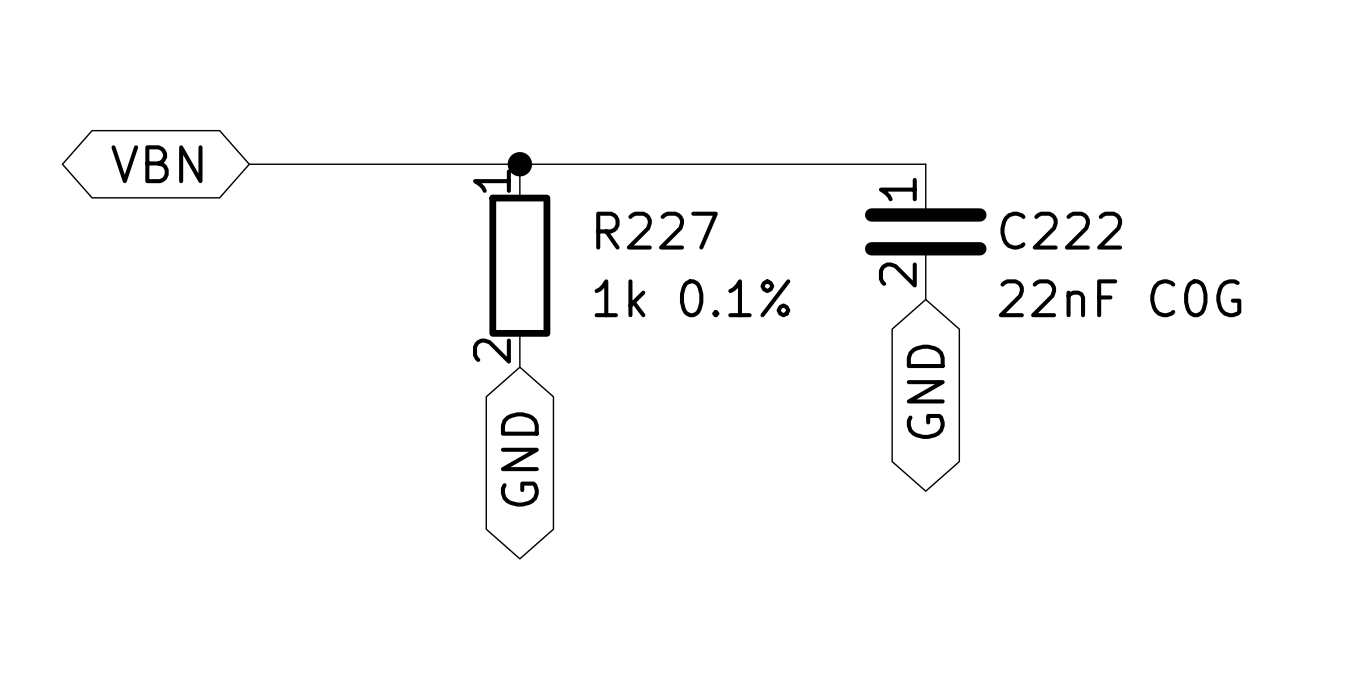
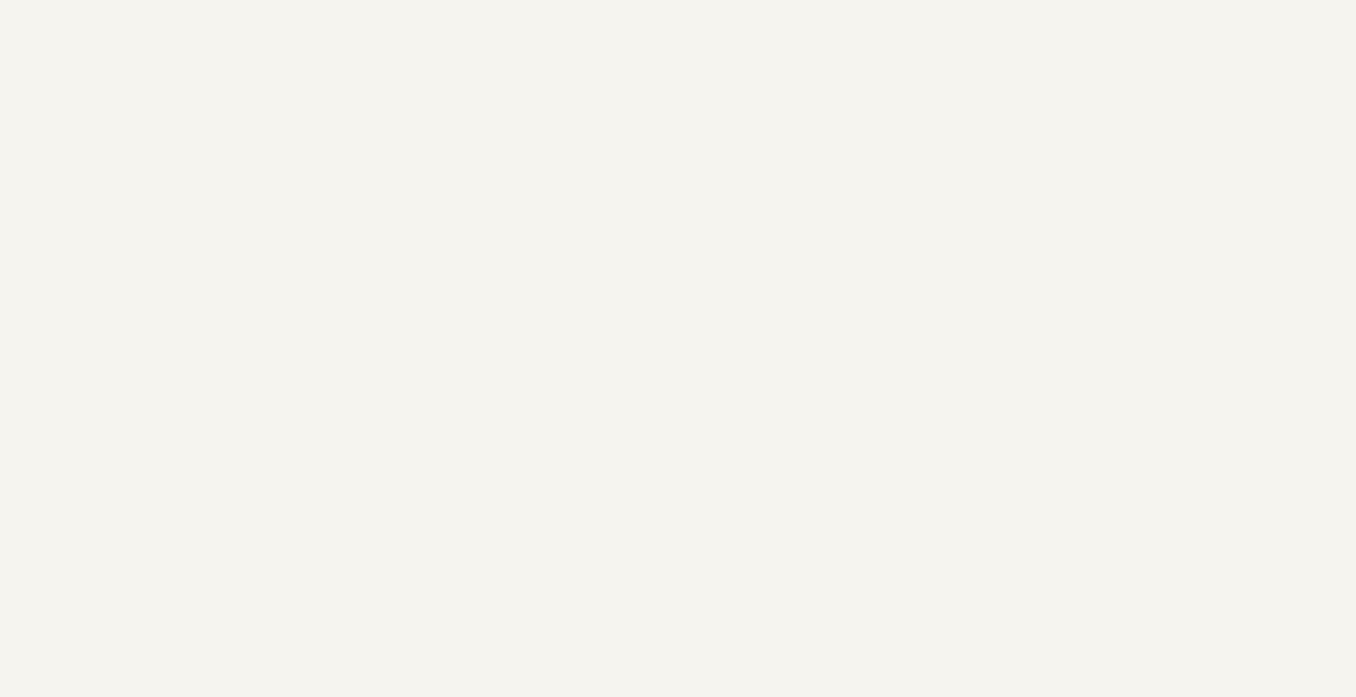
global label: VBN (156, 164) -> none
wire: (249, 164) (925, 164) -> none
junction: (519, 164) -> none
C222: 22nF C0G (925, 231) -> none
R227: 1k 0.1% (519, 265) -> none
global label: GND (925, 391) -> none
global label: GND (519, 459) -> none

